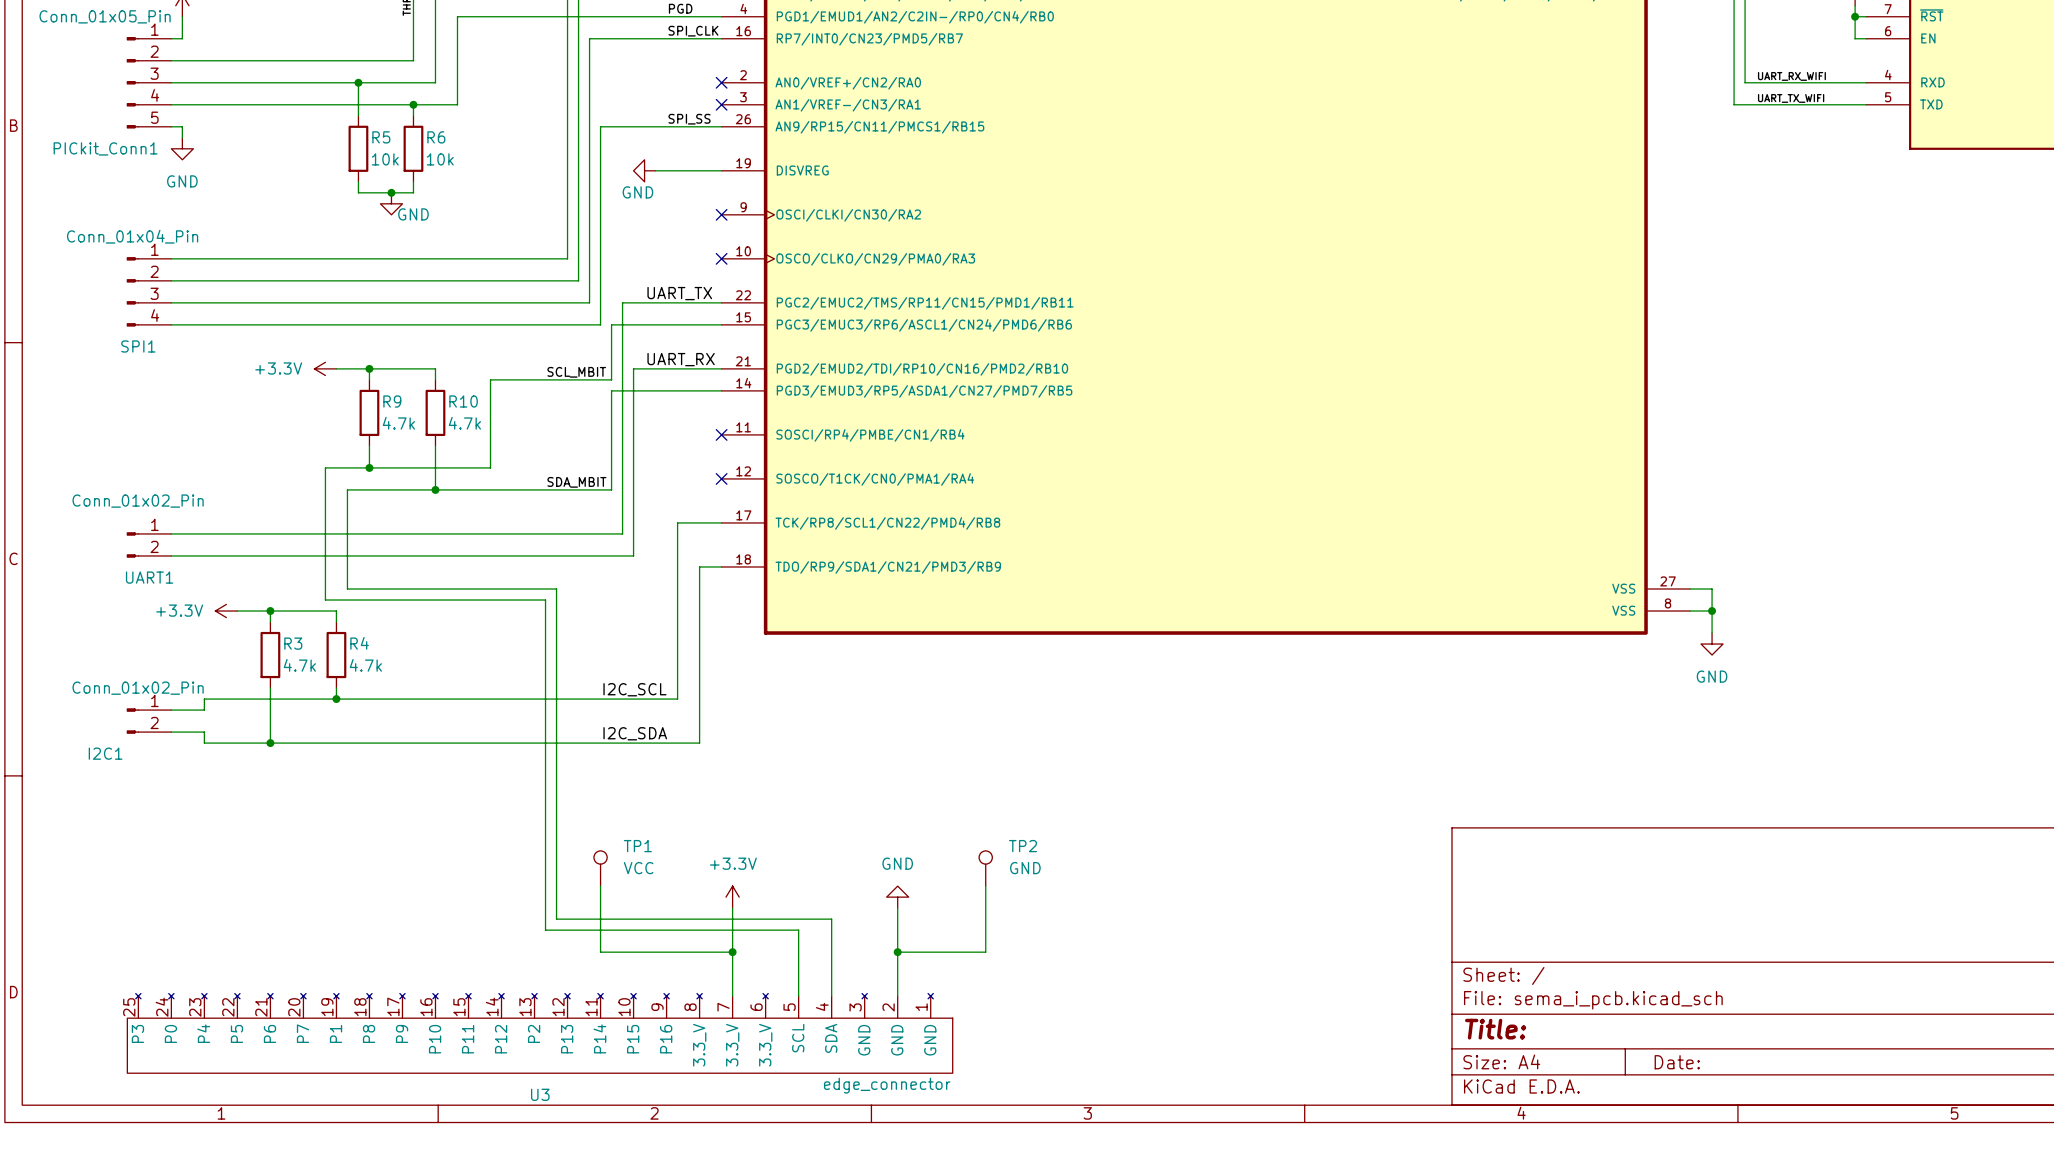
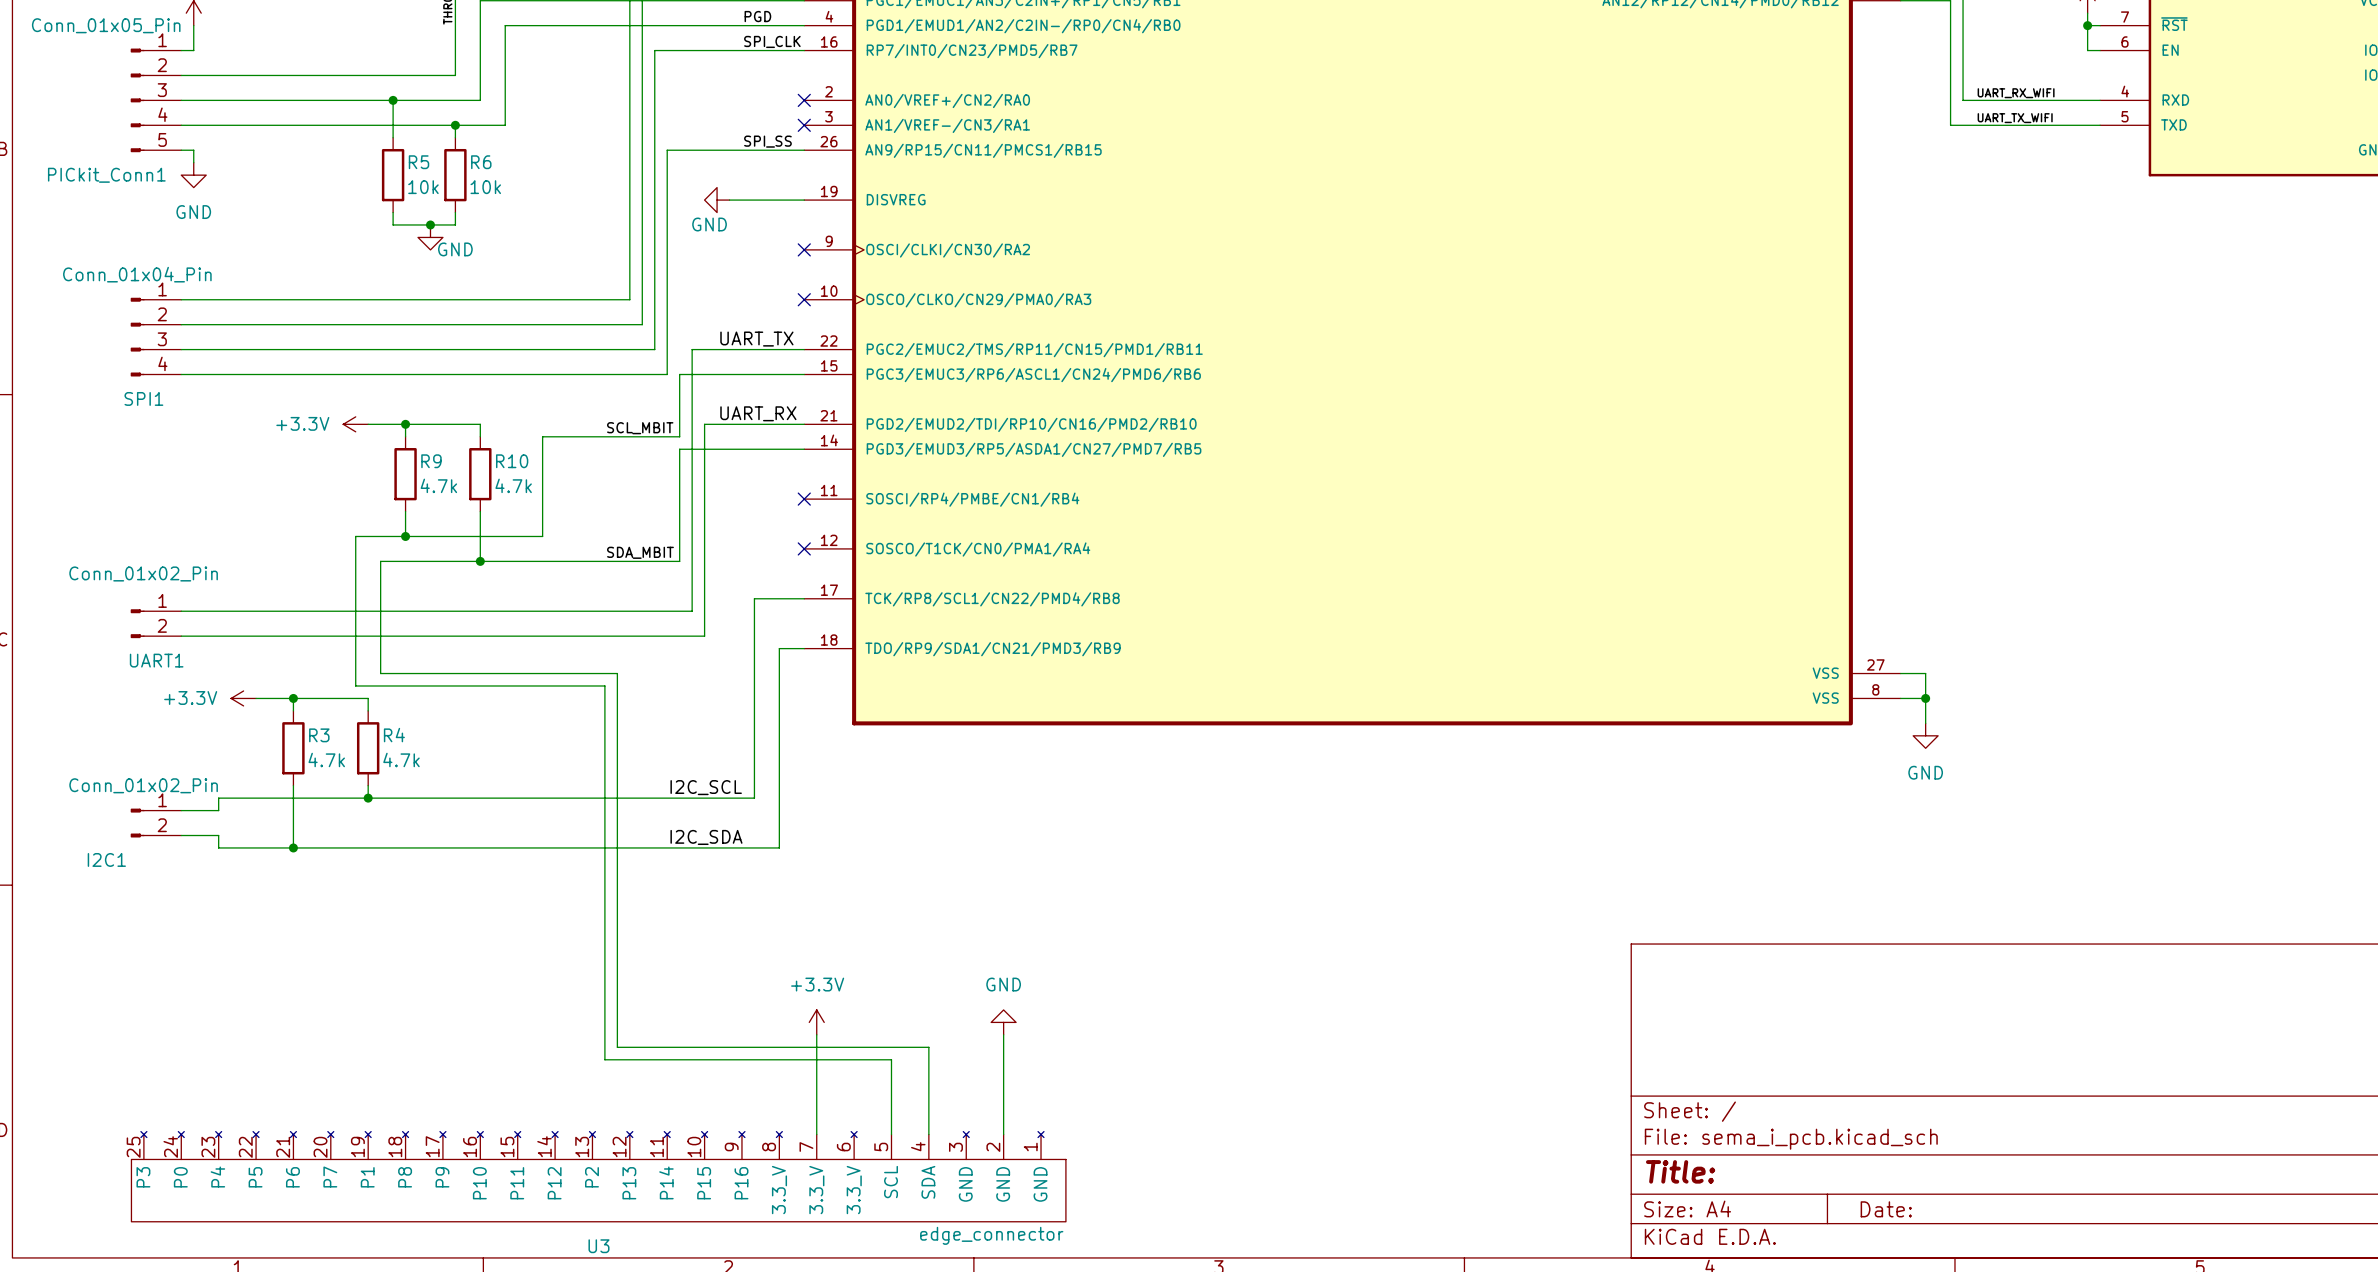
TP1: VCC (600, 868) -> none
TP2: GND (985, 868) -> none
wire: (600, 886) (600, 952) (732, 952) -> none
wire: (985, 886) (985, 952) (897, 952) -> none
junction: (732, 952) -> none
junction: (897, 952) -> none

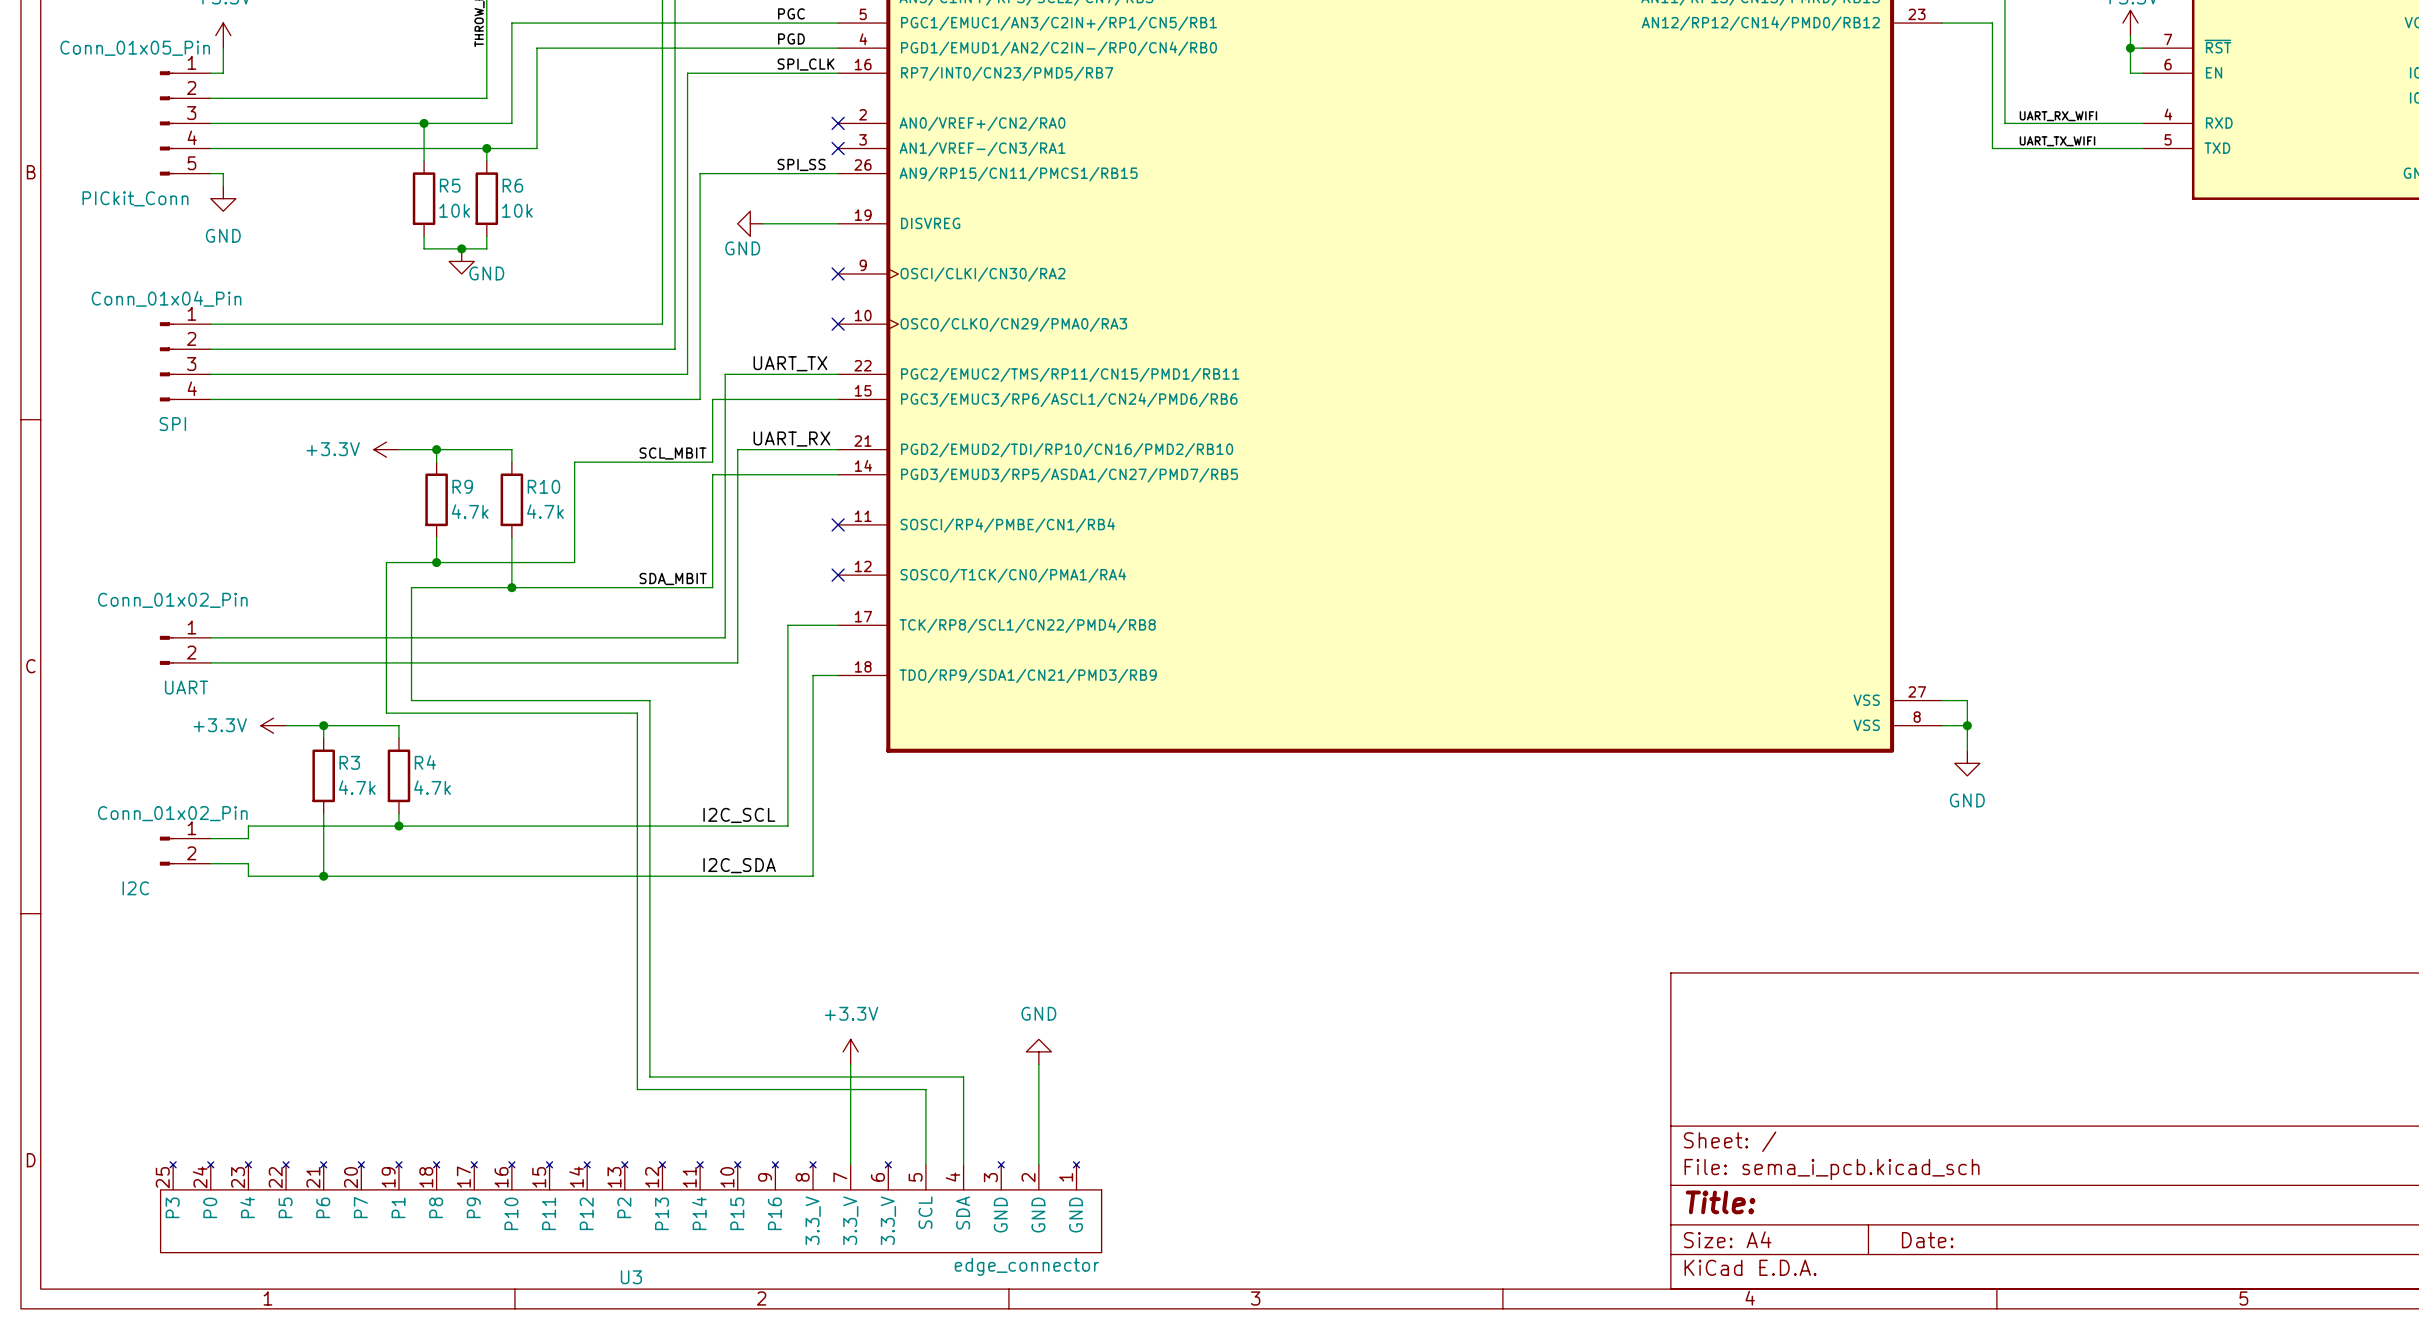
PICkit_Conn1 name: PICkit_Conn1 (106, 175) -> PICkit_Conn (135, 198)
SPI1 name: SPI1 (143, 398) -> SPI (172, 424)
UART1 name: UART1 (156, 660) -> UART (186, 687)
I2C1 name: I2C1 (106, 859) -> I2C (135, 888)

